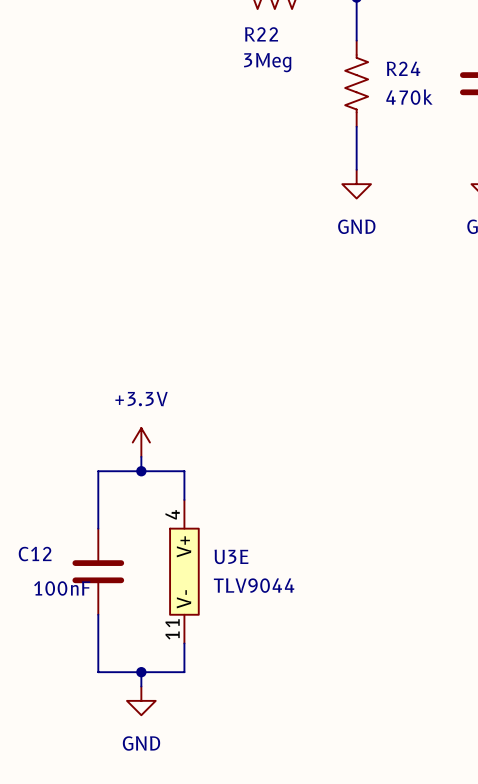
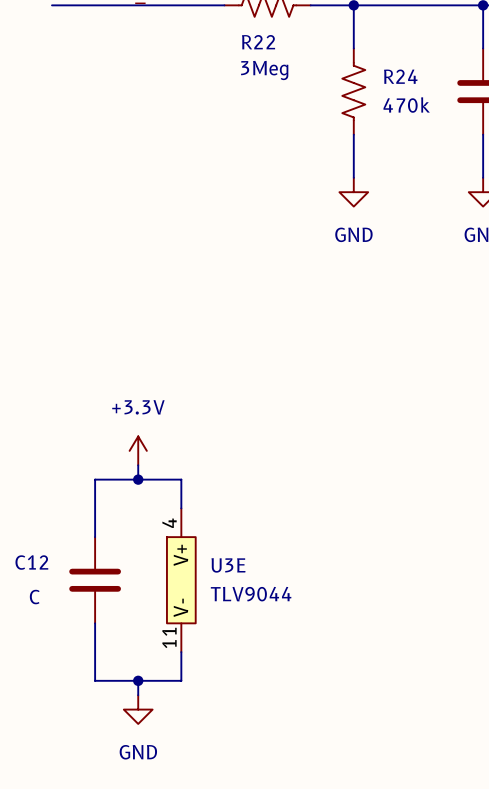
C12 value: 100nF (62, 588) -> C (34, 597)

